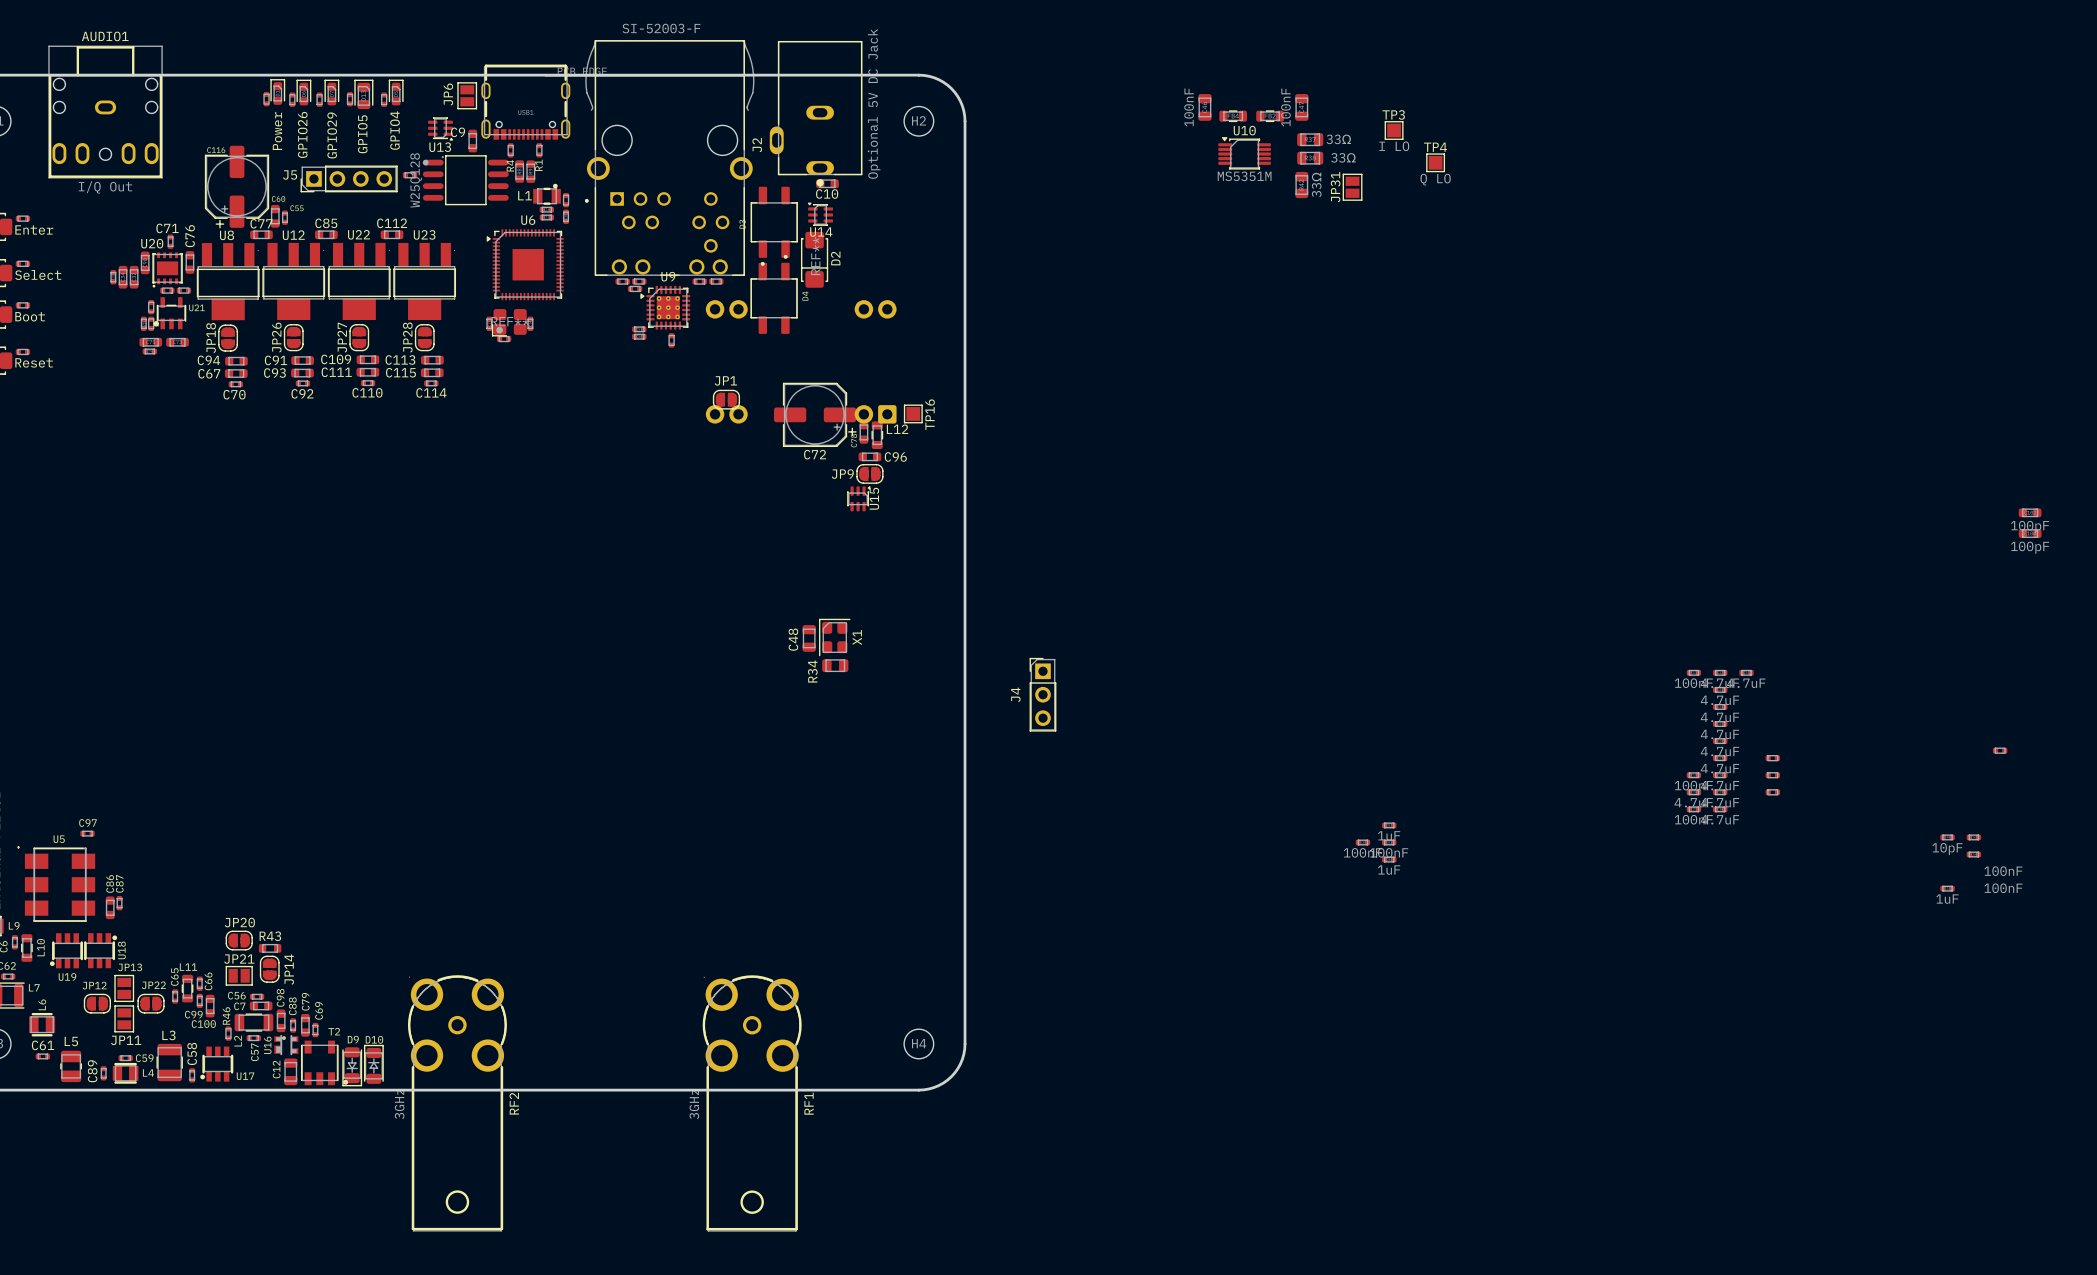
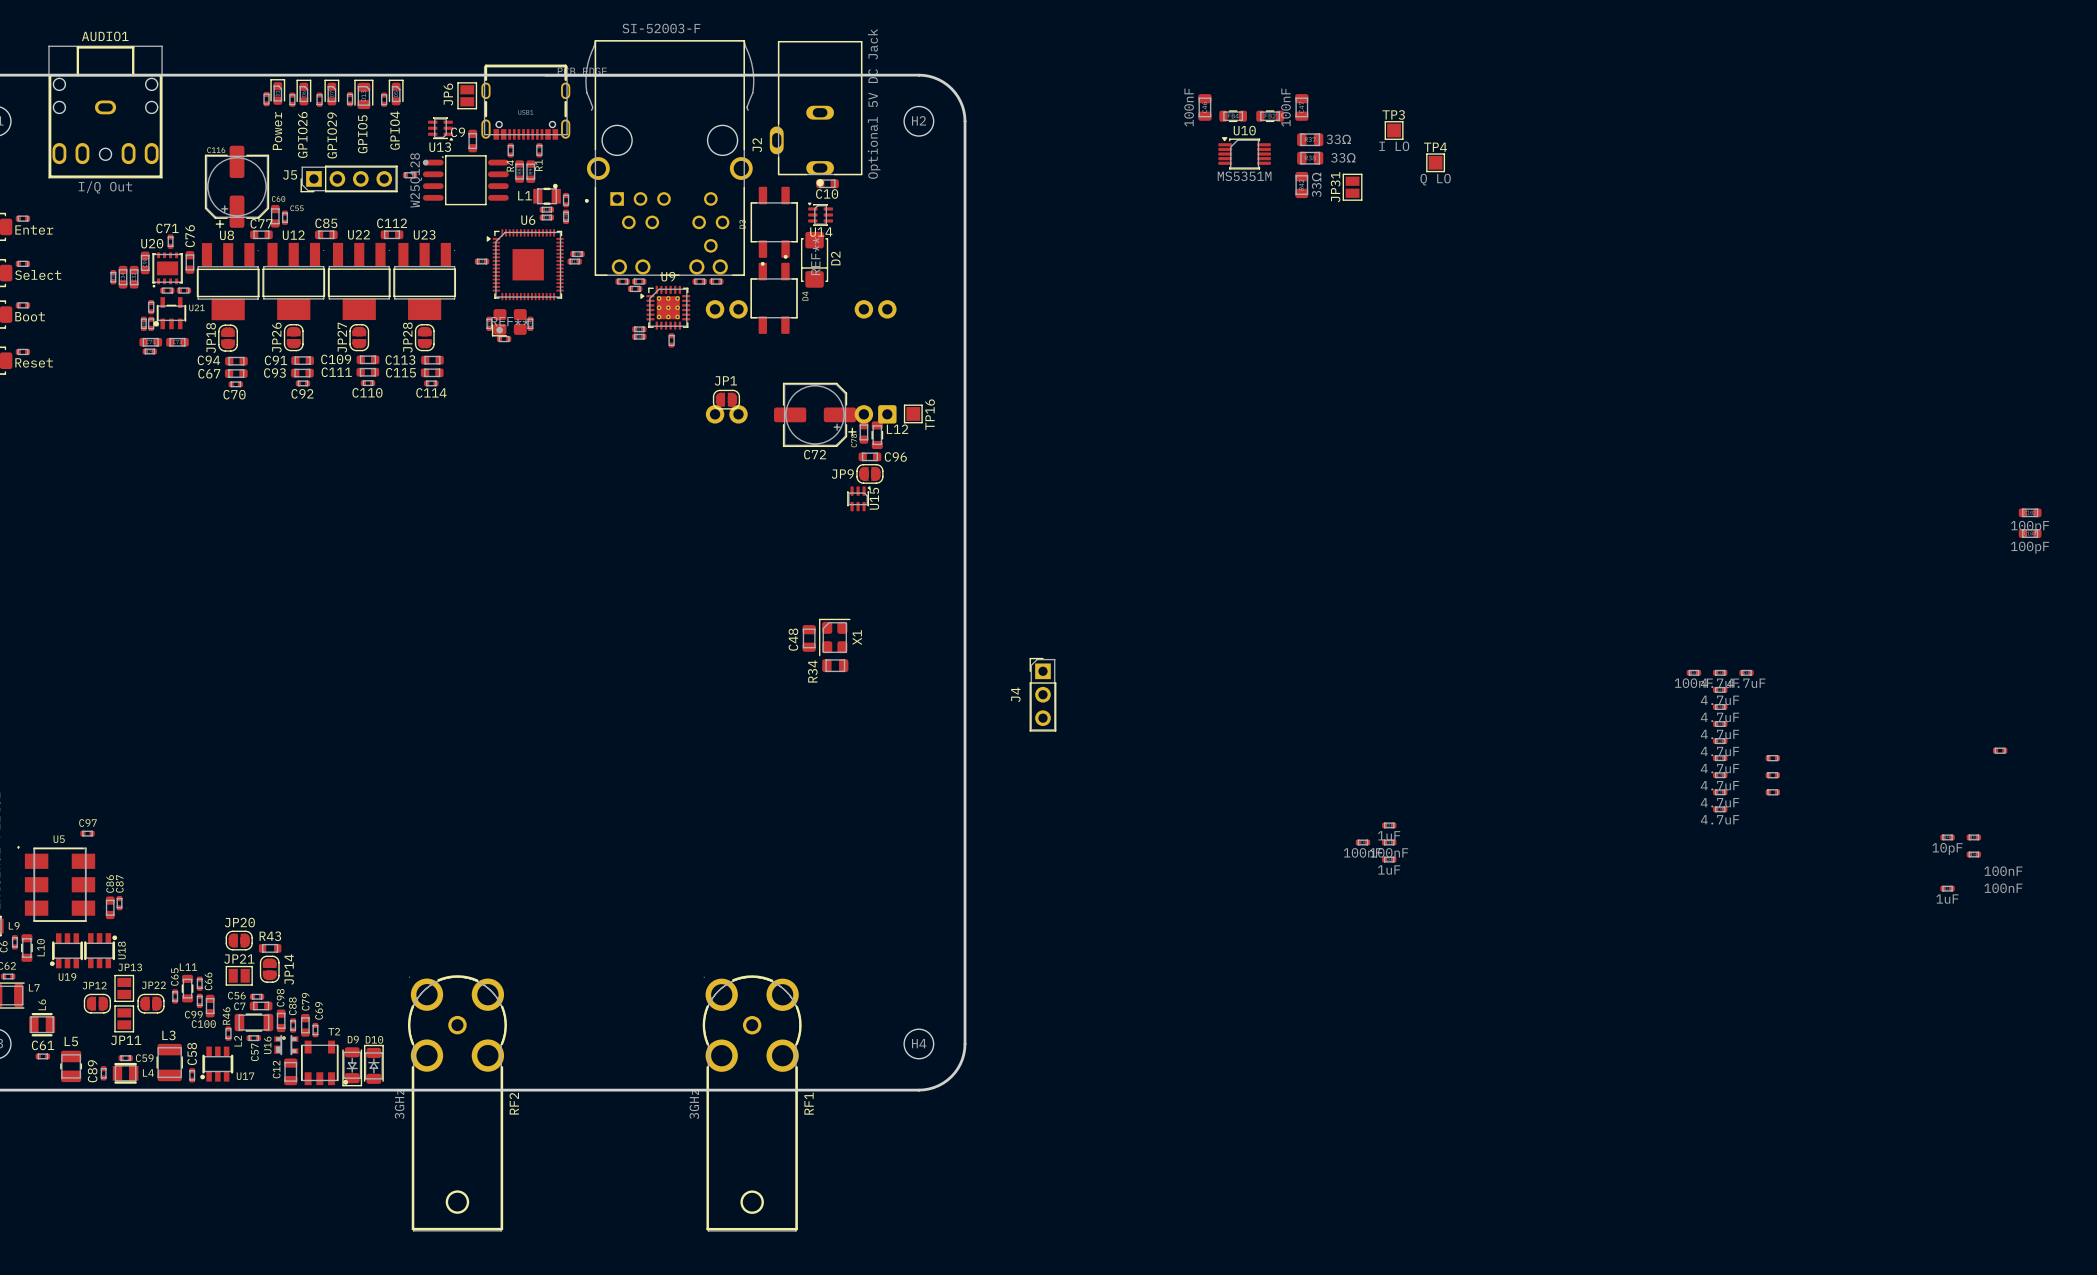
part position: (1693, 775) -> (574, 261)
part value: 100nF (1693, 785) -> none
part position: (1693, 792) -> (577, 254)
part value: 4.7uF (1693, 802) -> none
part position: (1693, 809) -> (481, 261)
part value: 100nF (1693, 819) -> none

